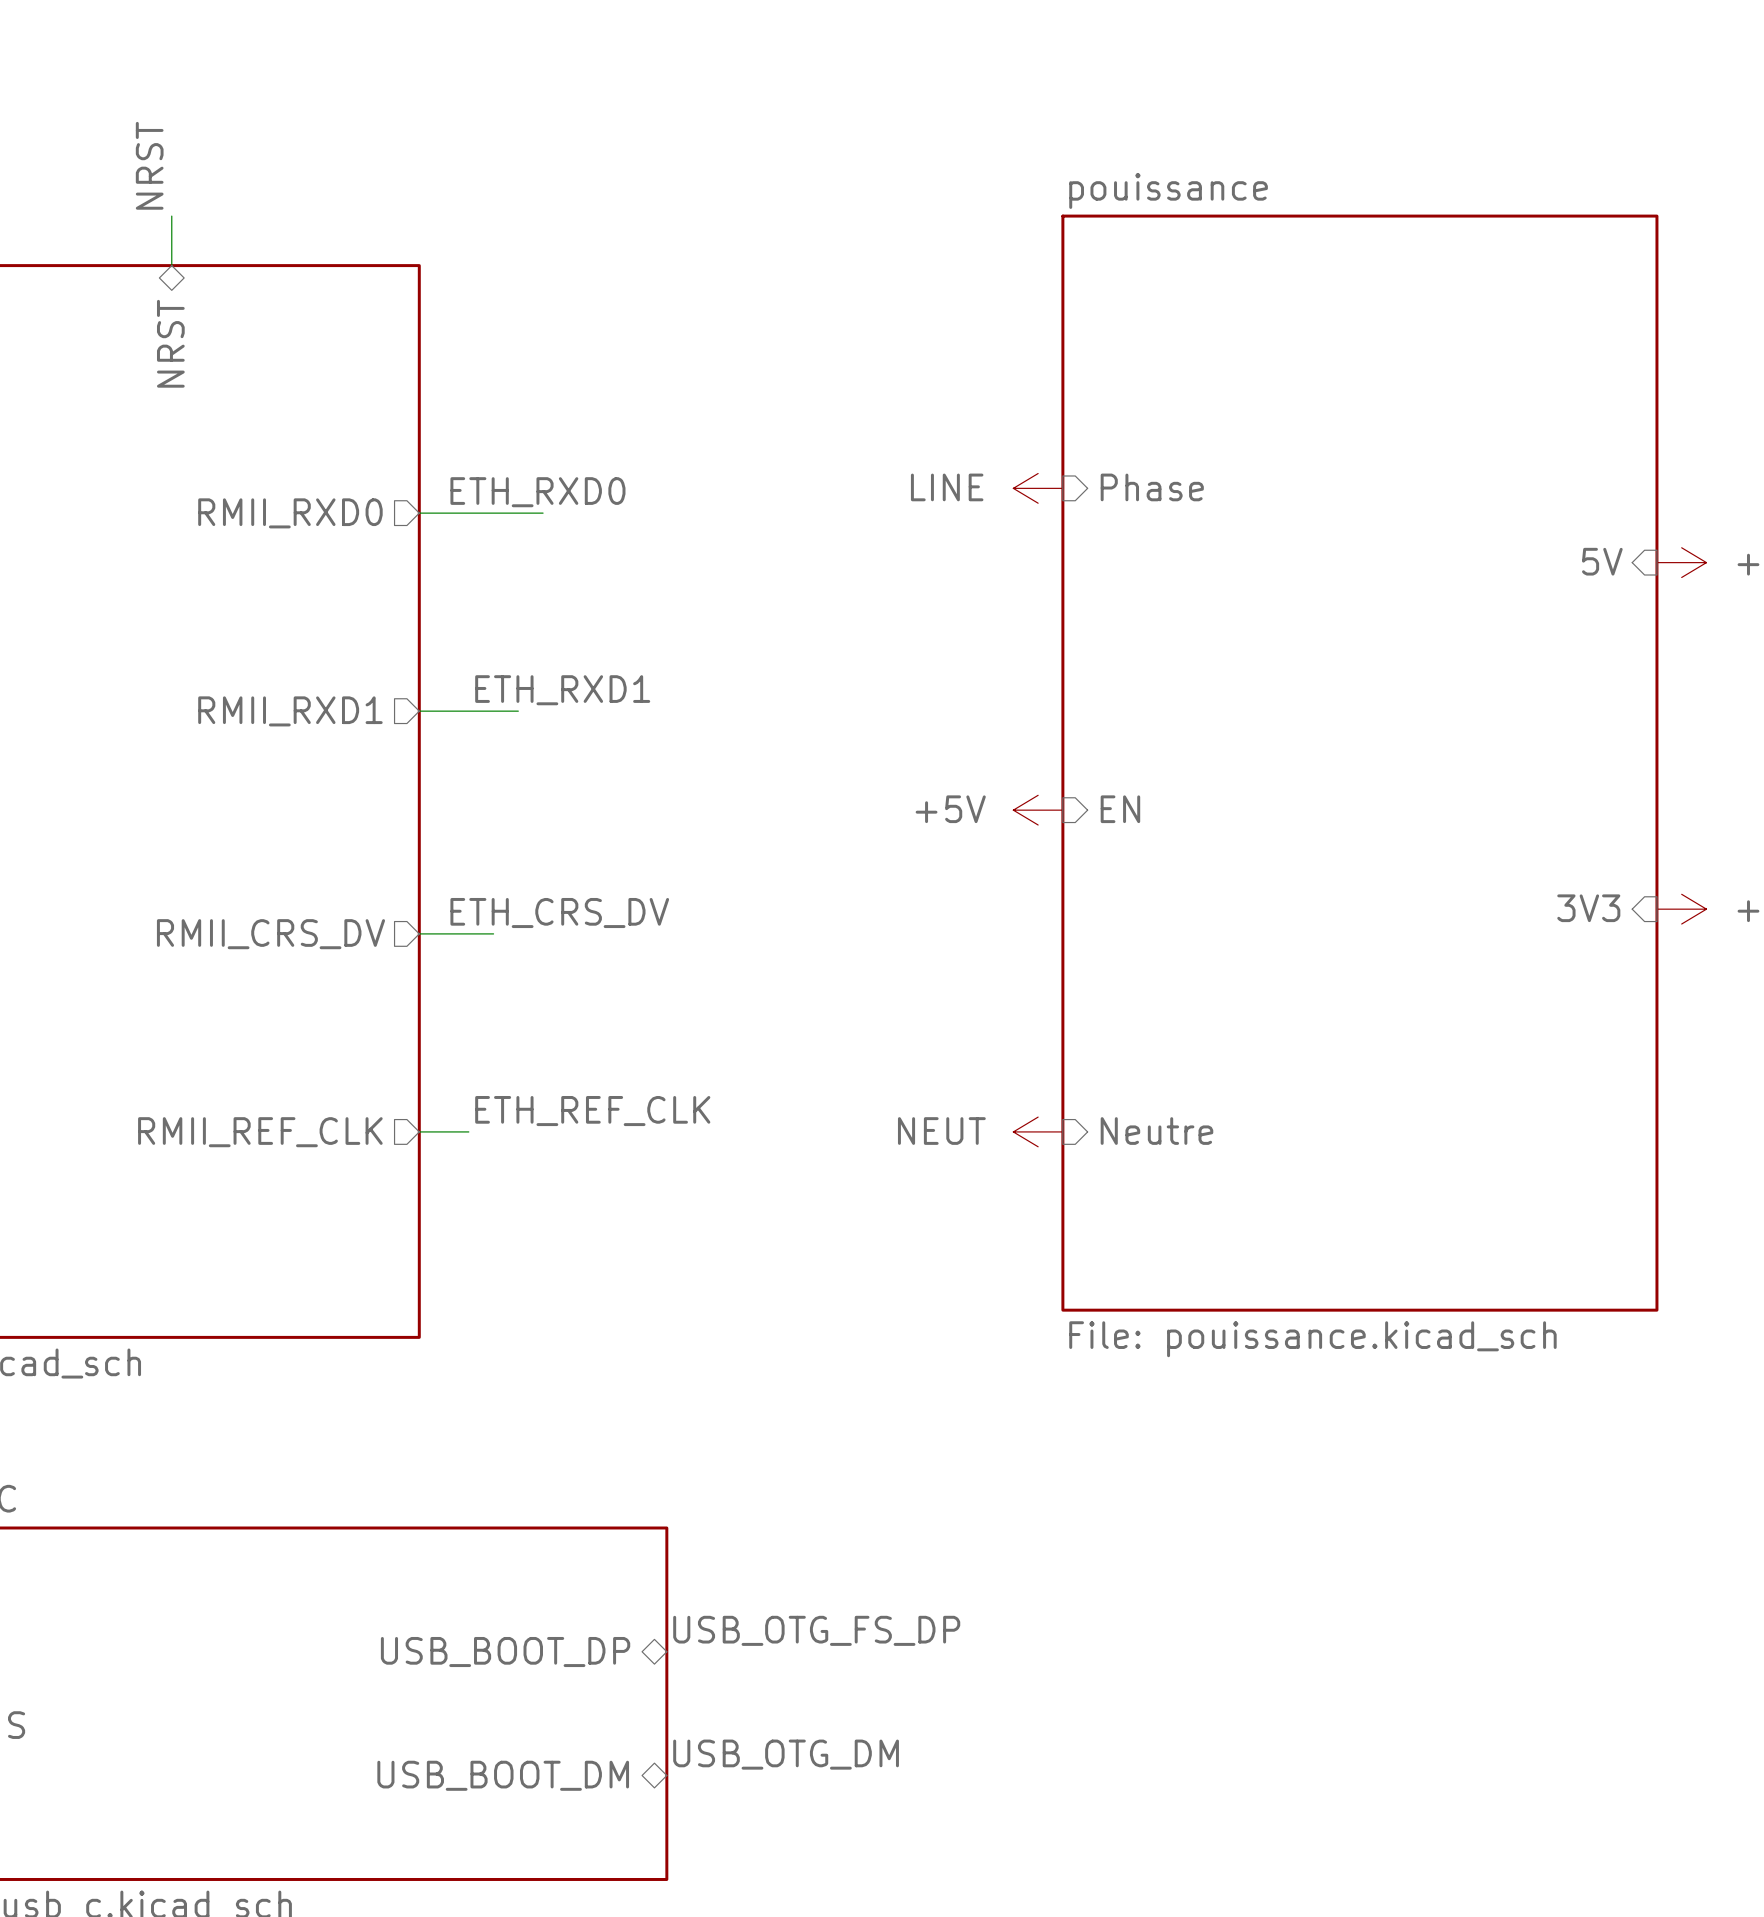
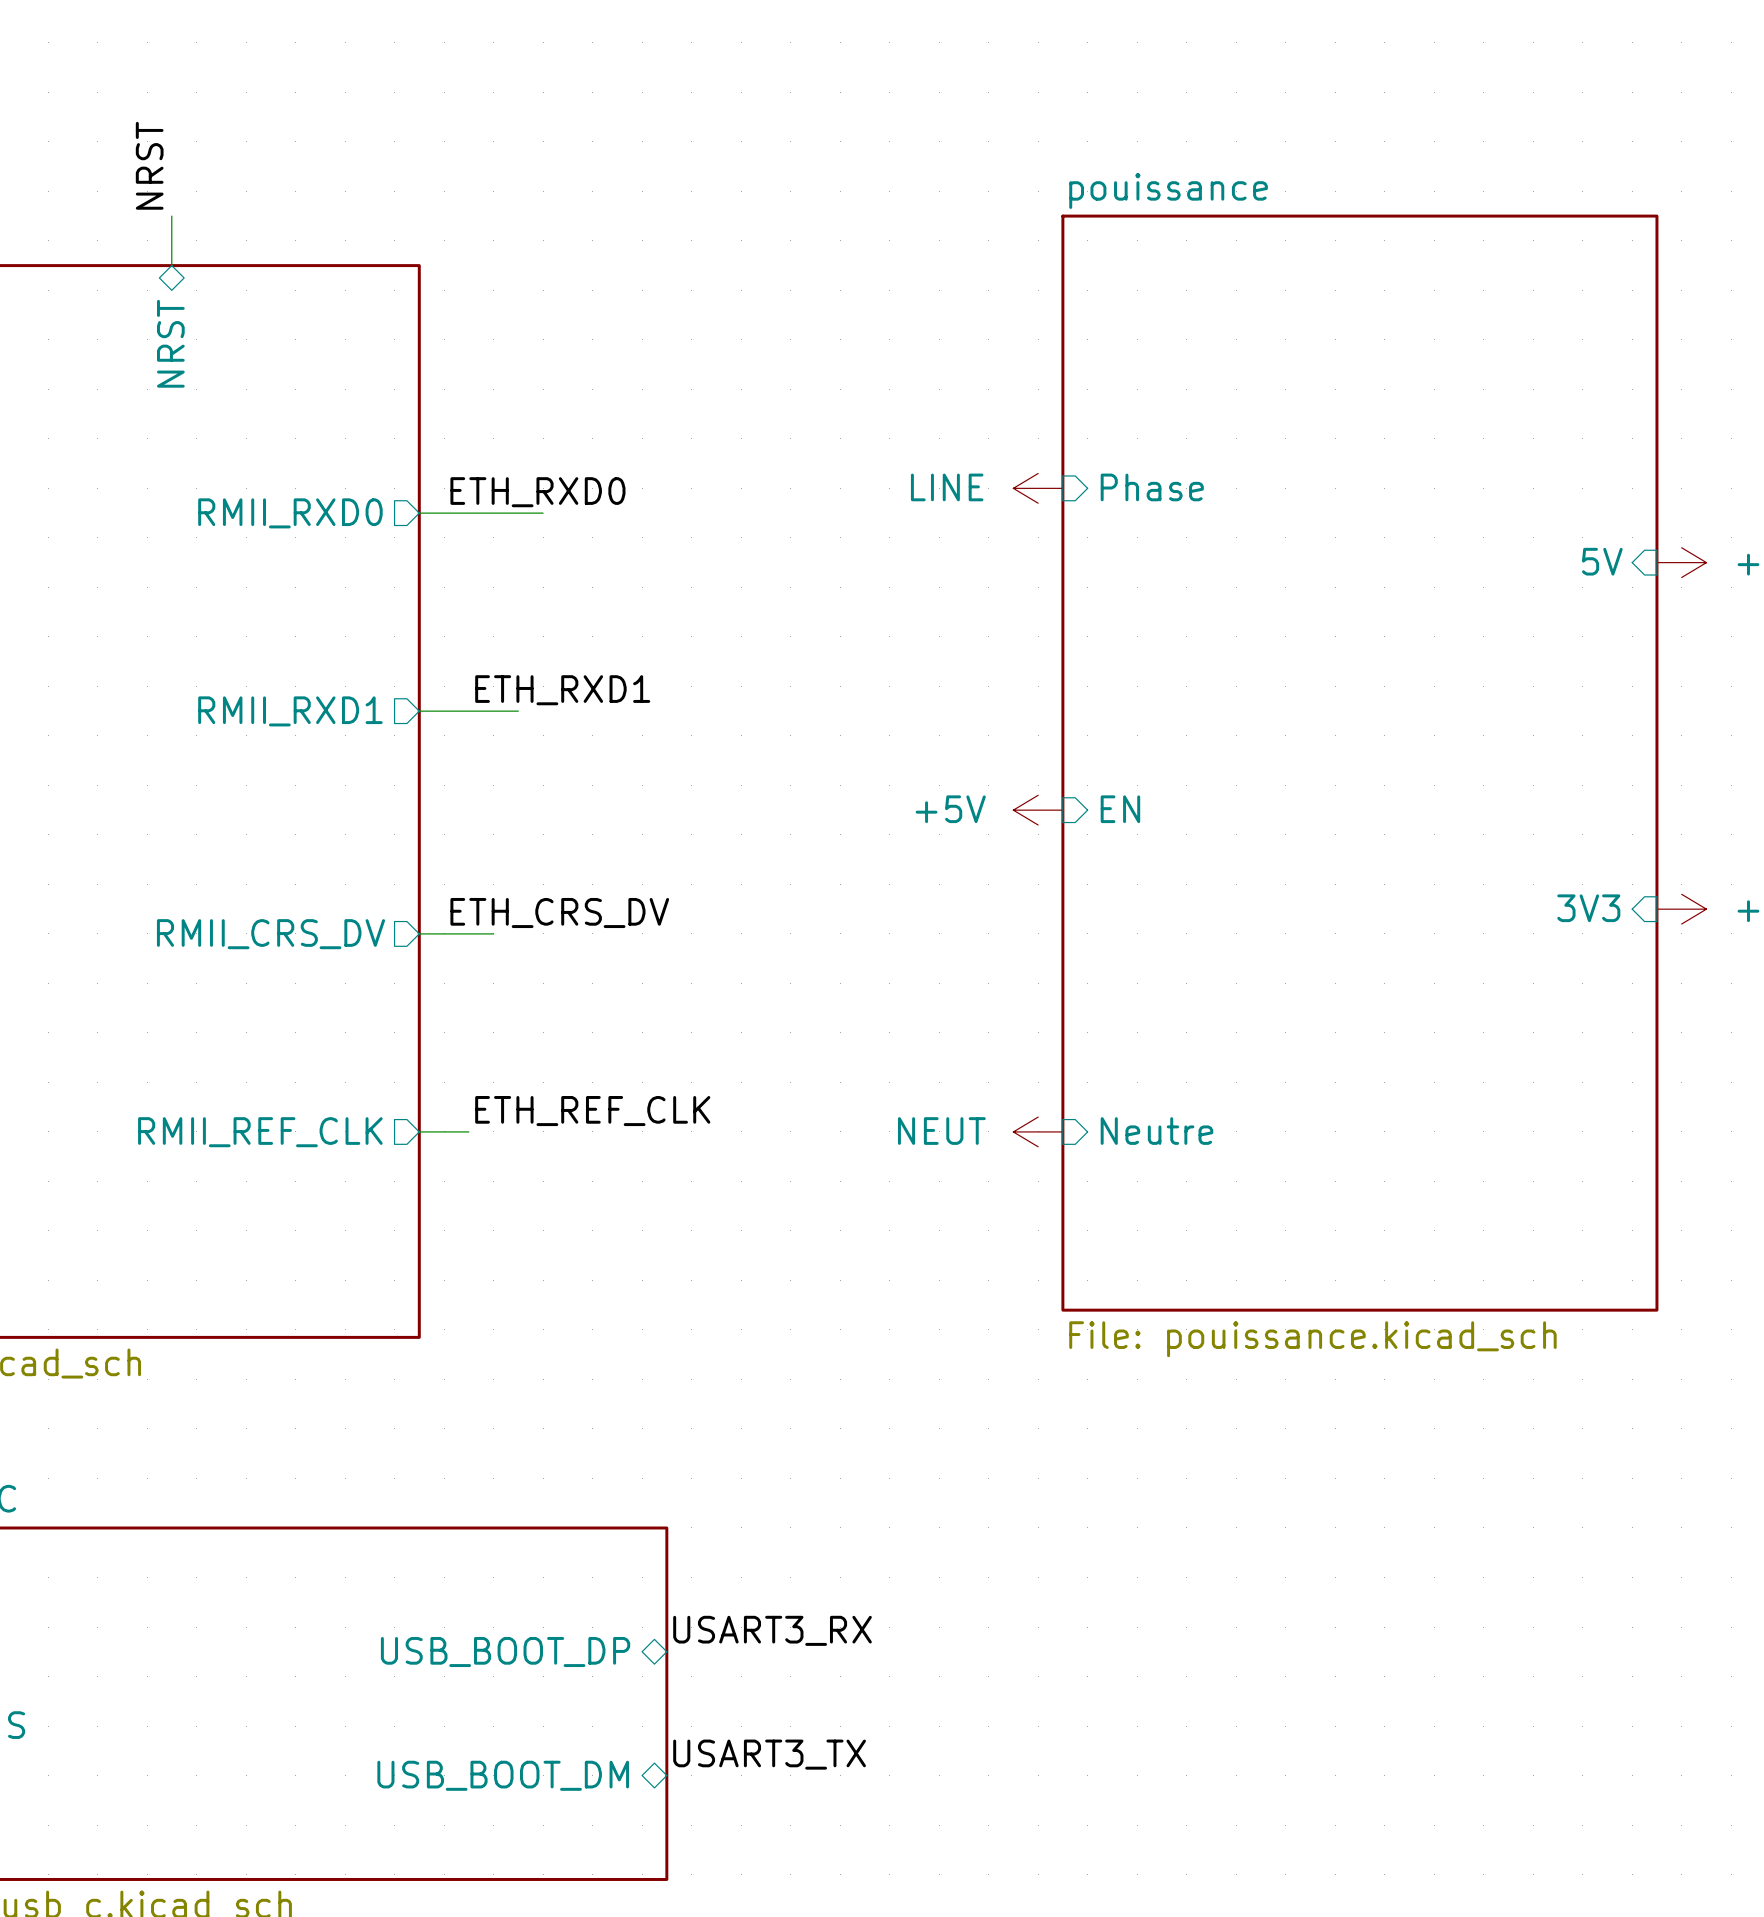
label: USB_OTG_FS_DP (816, 1630) -> USART3_RX (772, 1630)
label: USB_OTG_DM (786, 1754) -> USART3_TX (769, 1754)

